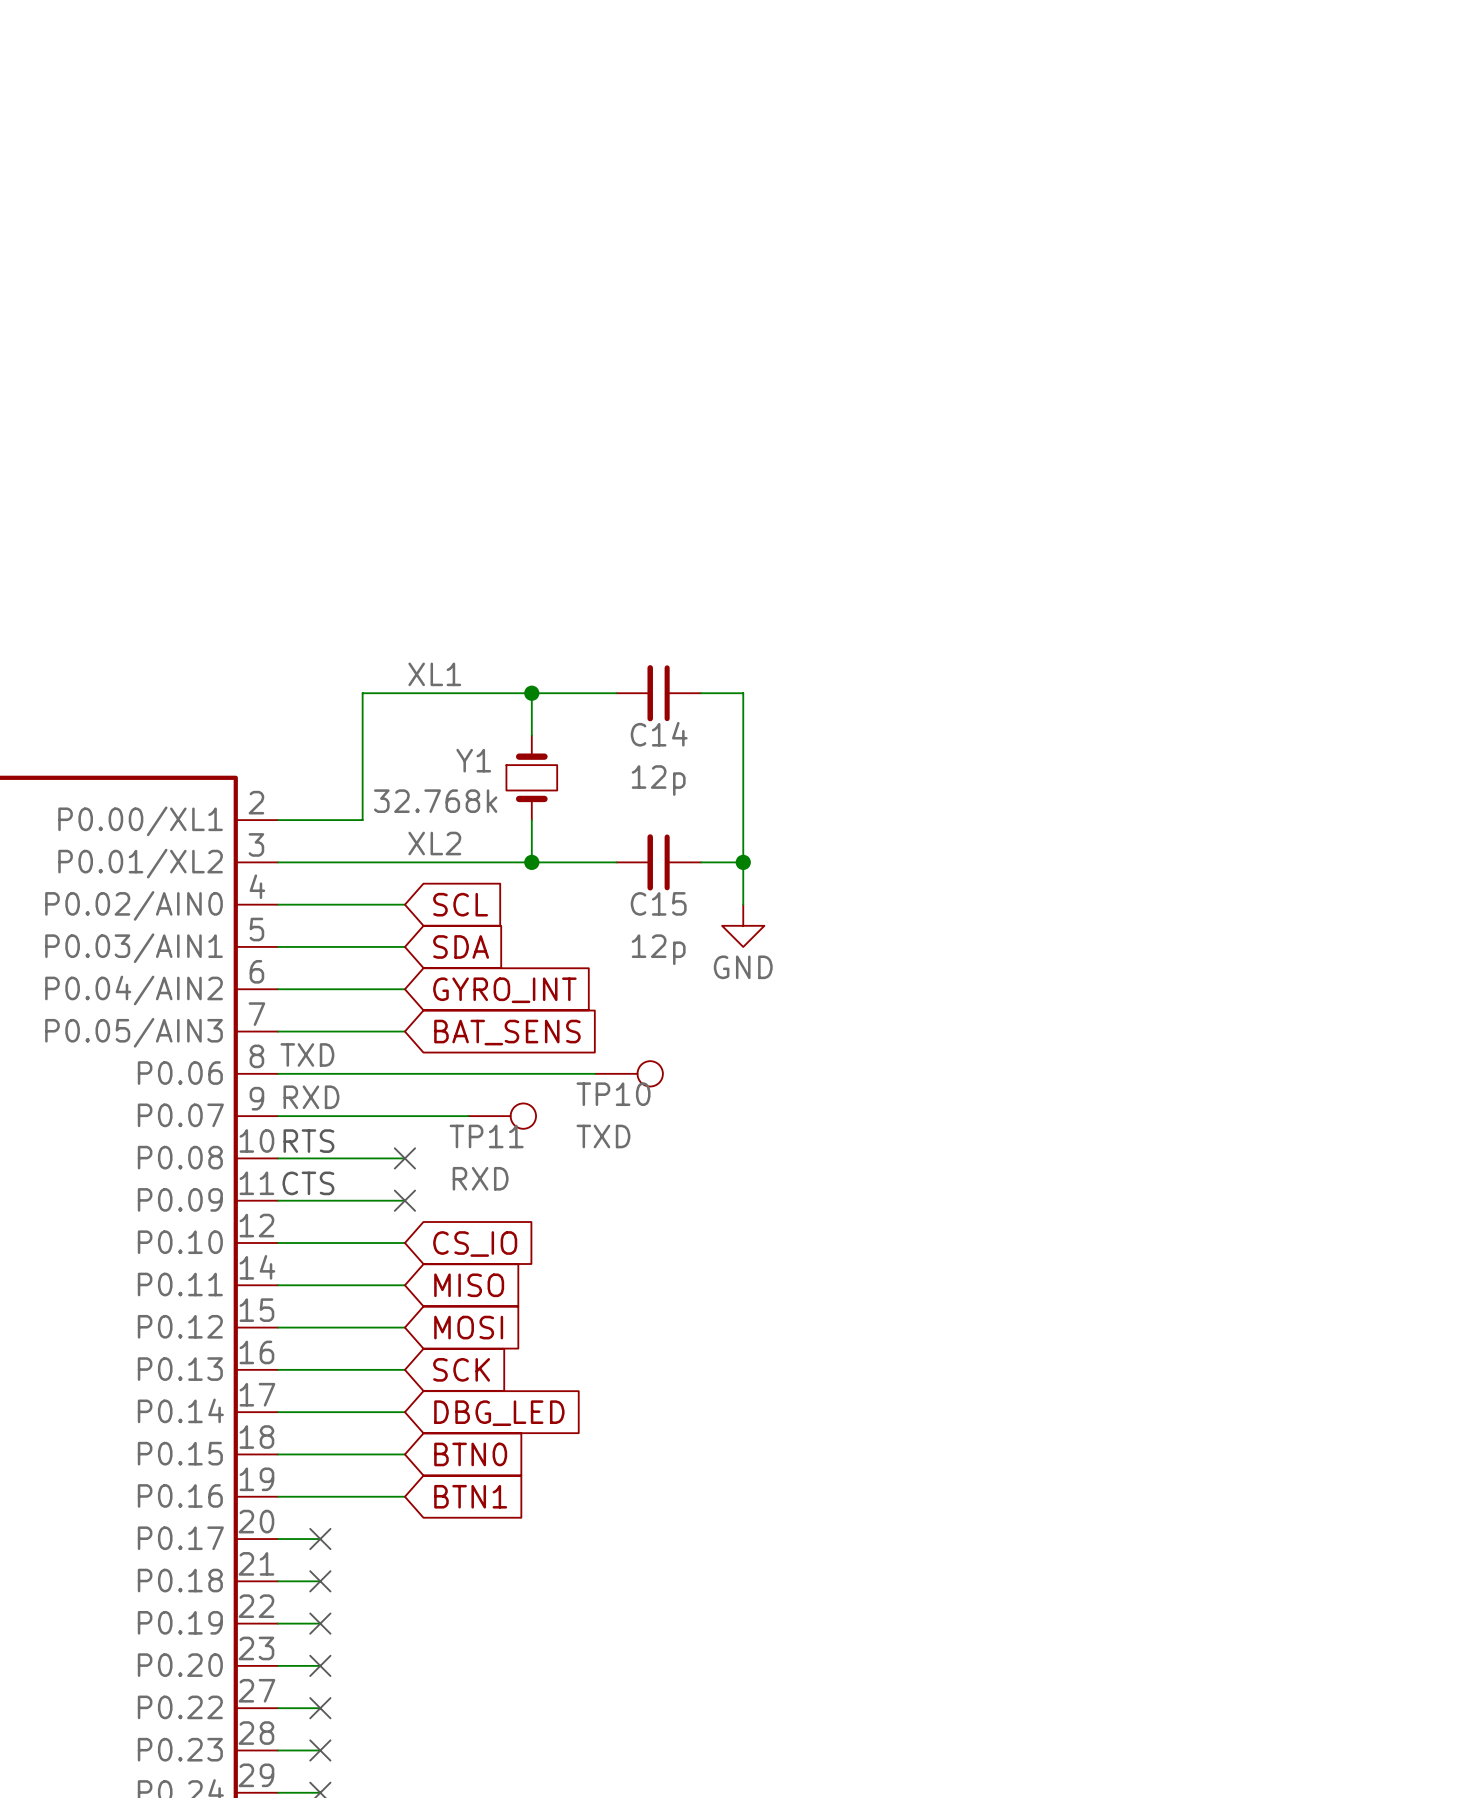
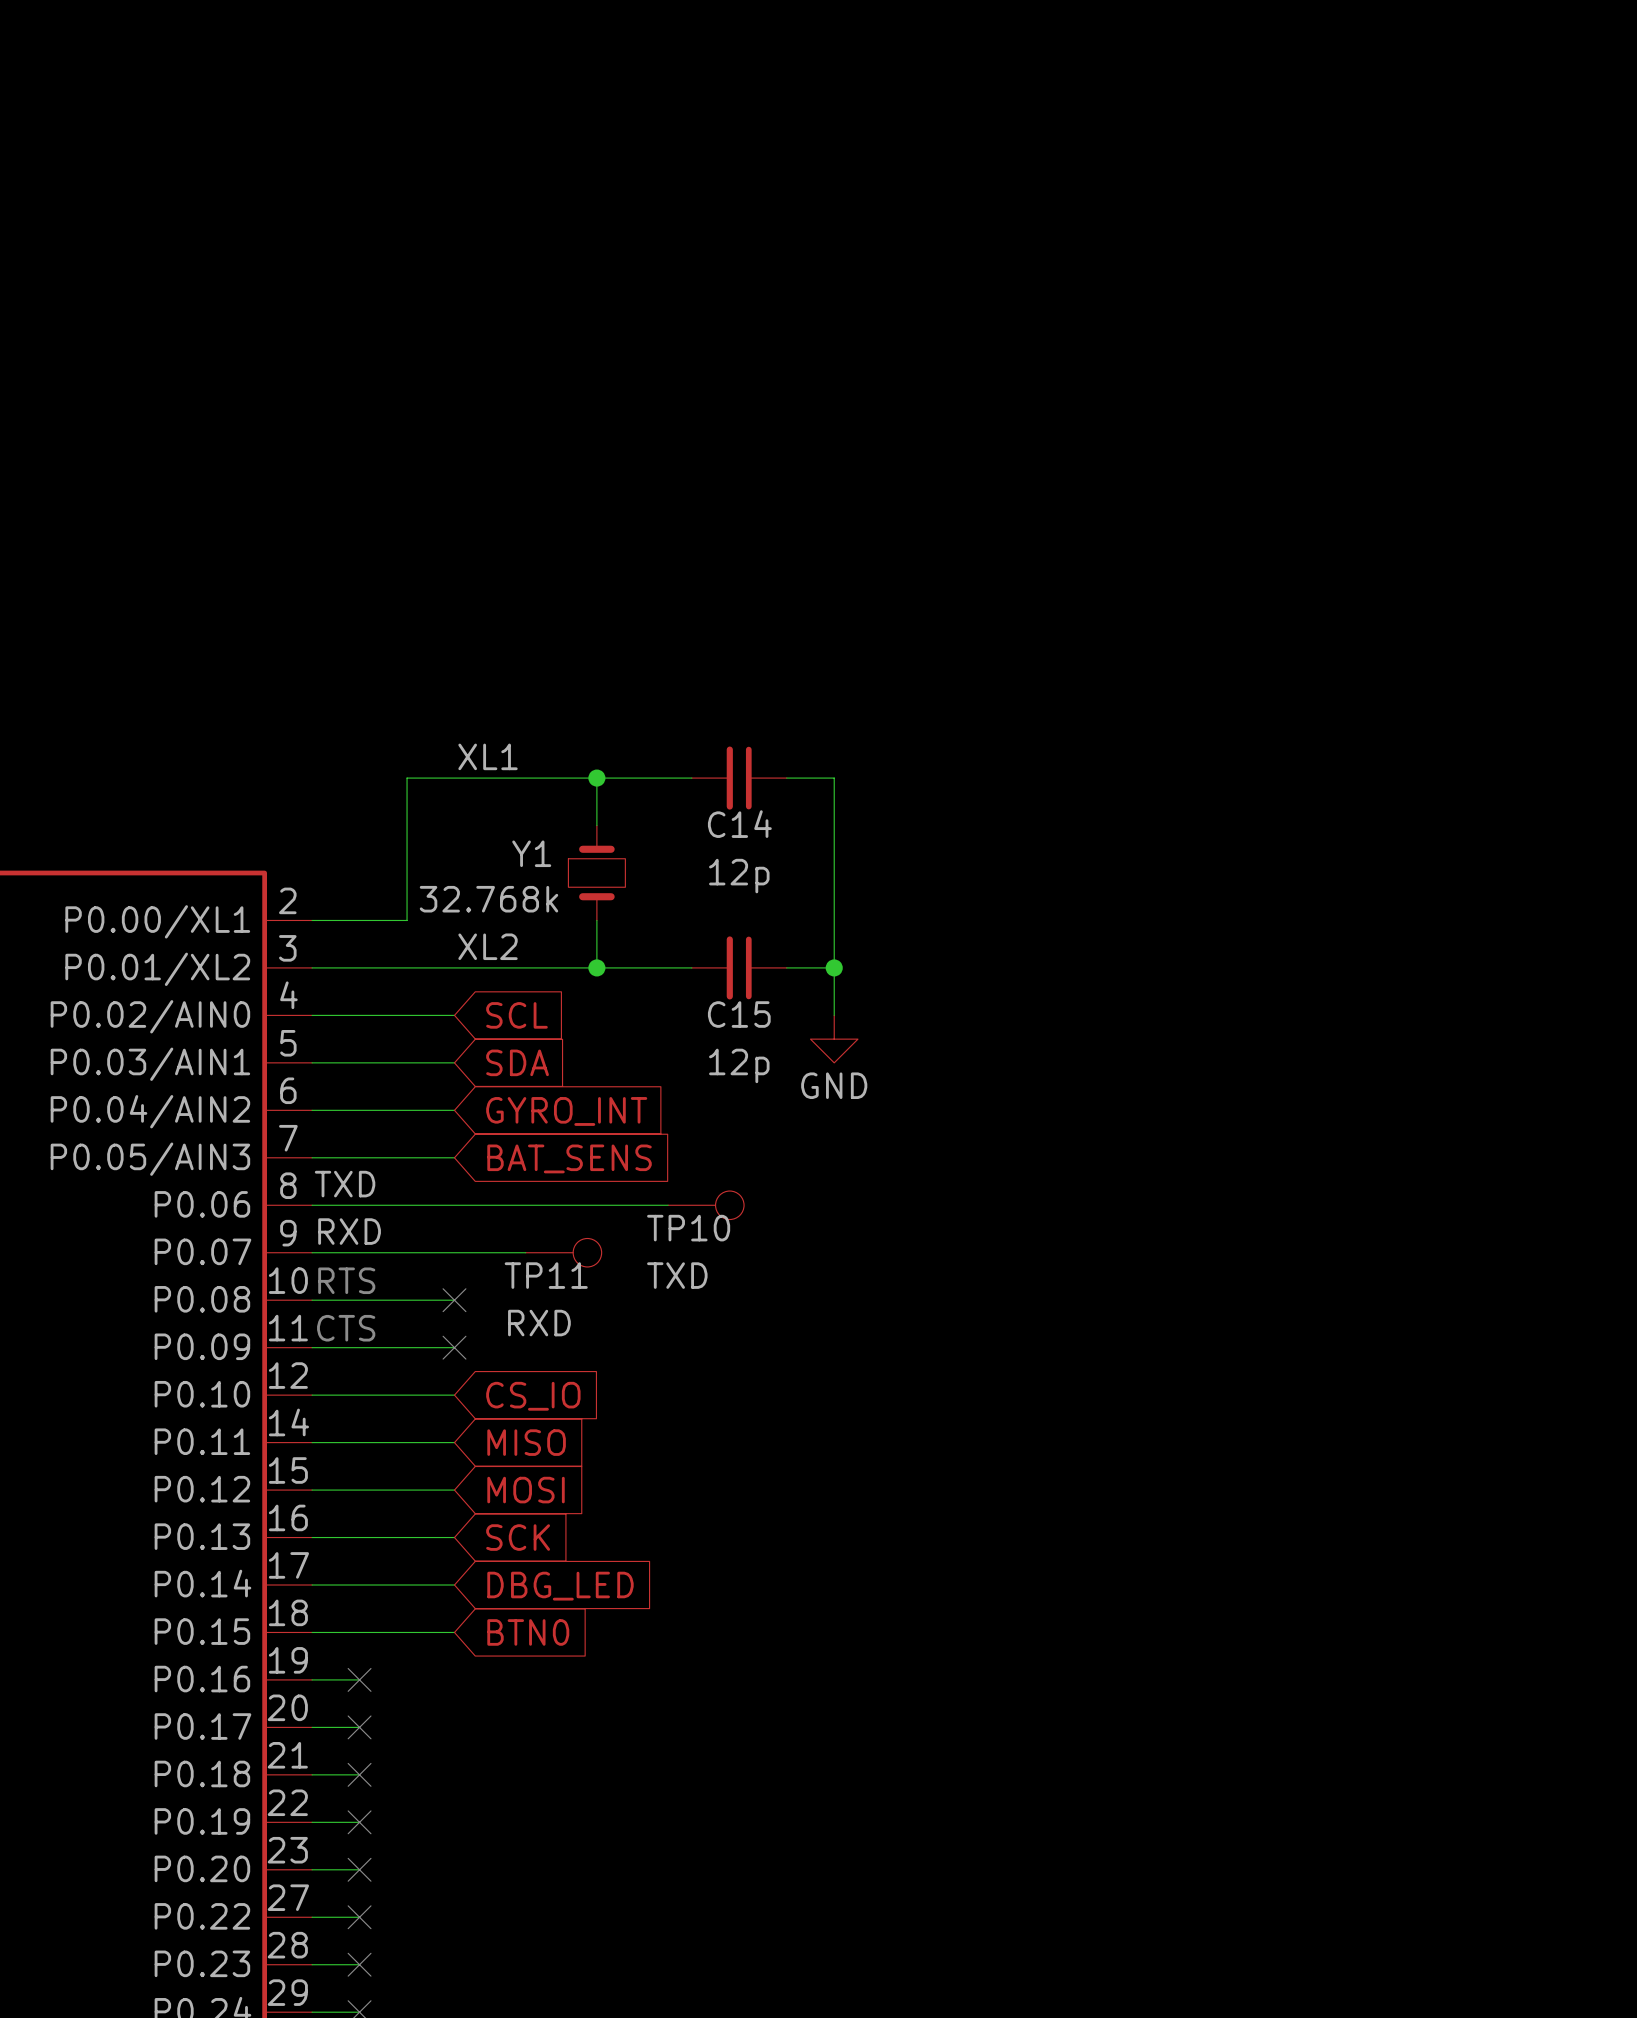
wire: (320, 1496) (404, 1496) -> none
no-connect mark: none -> (359, 1679)
global label: BTN1 (470, 1496) -> none

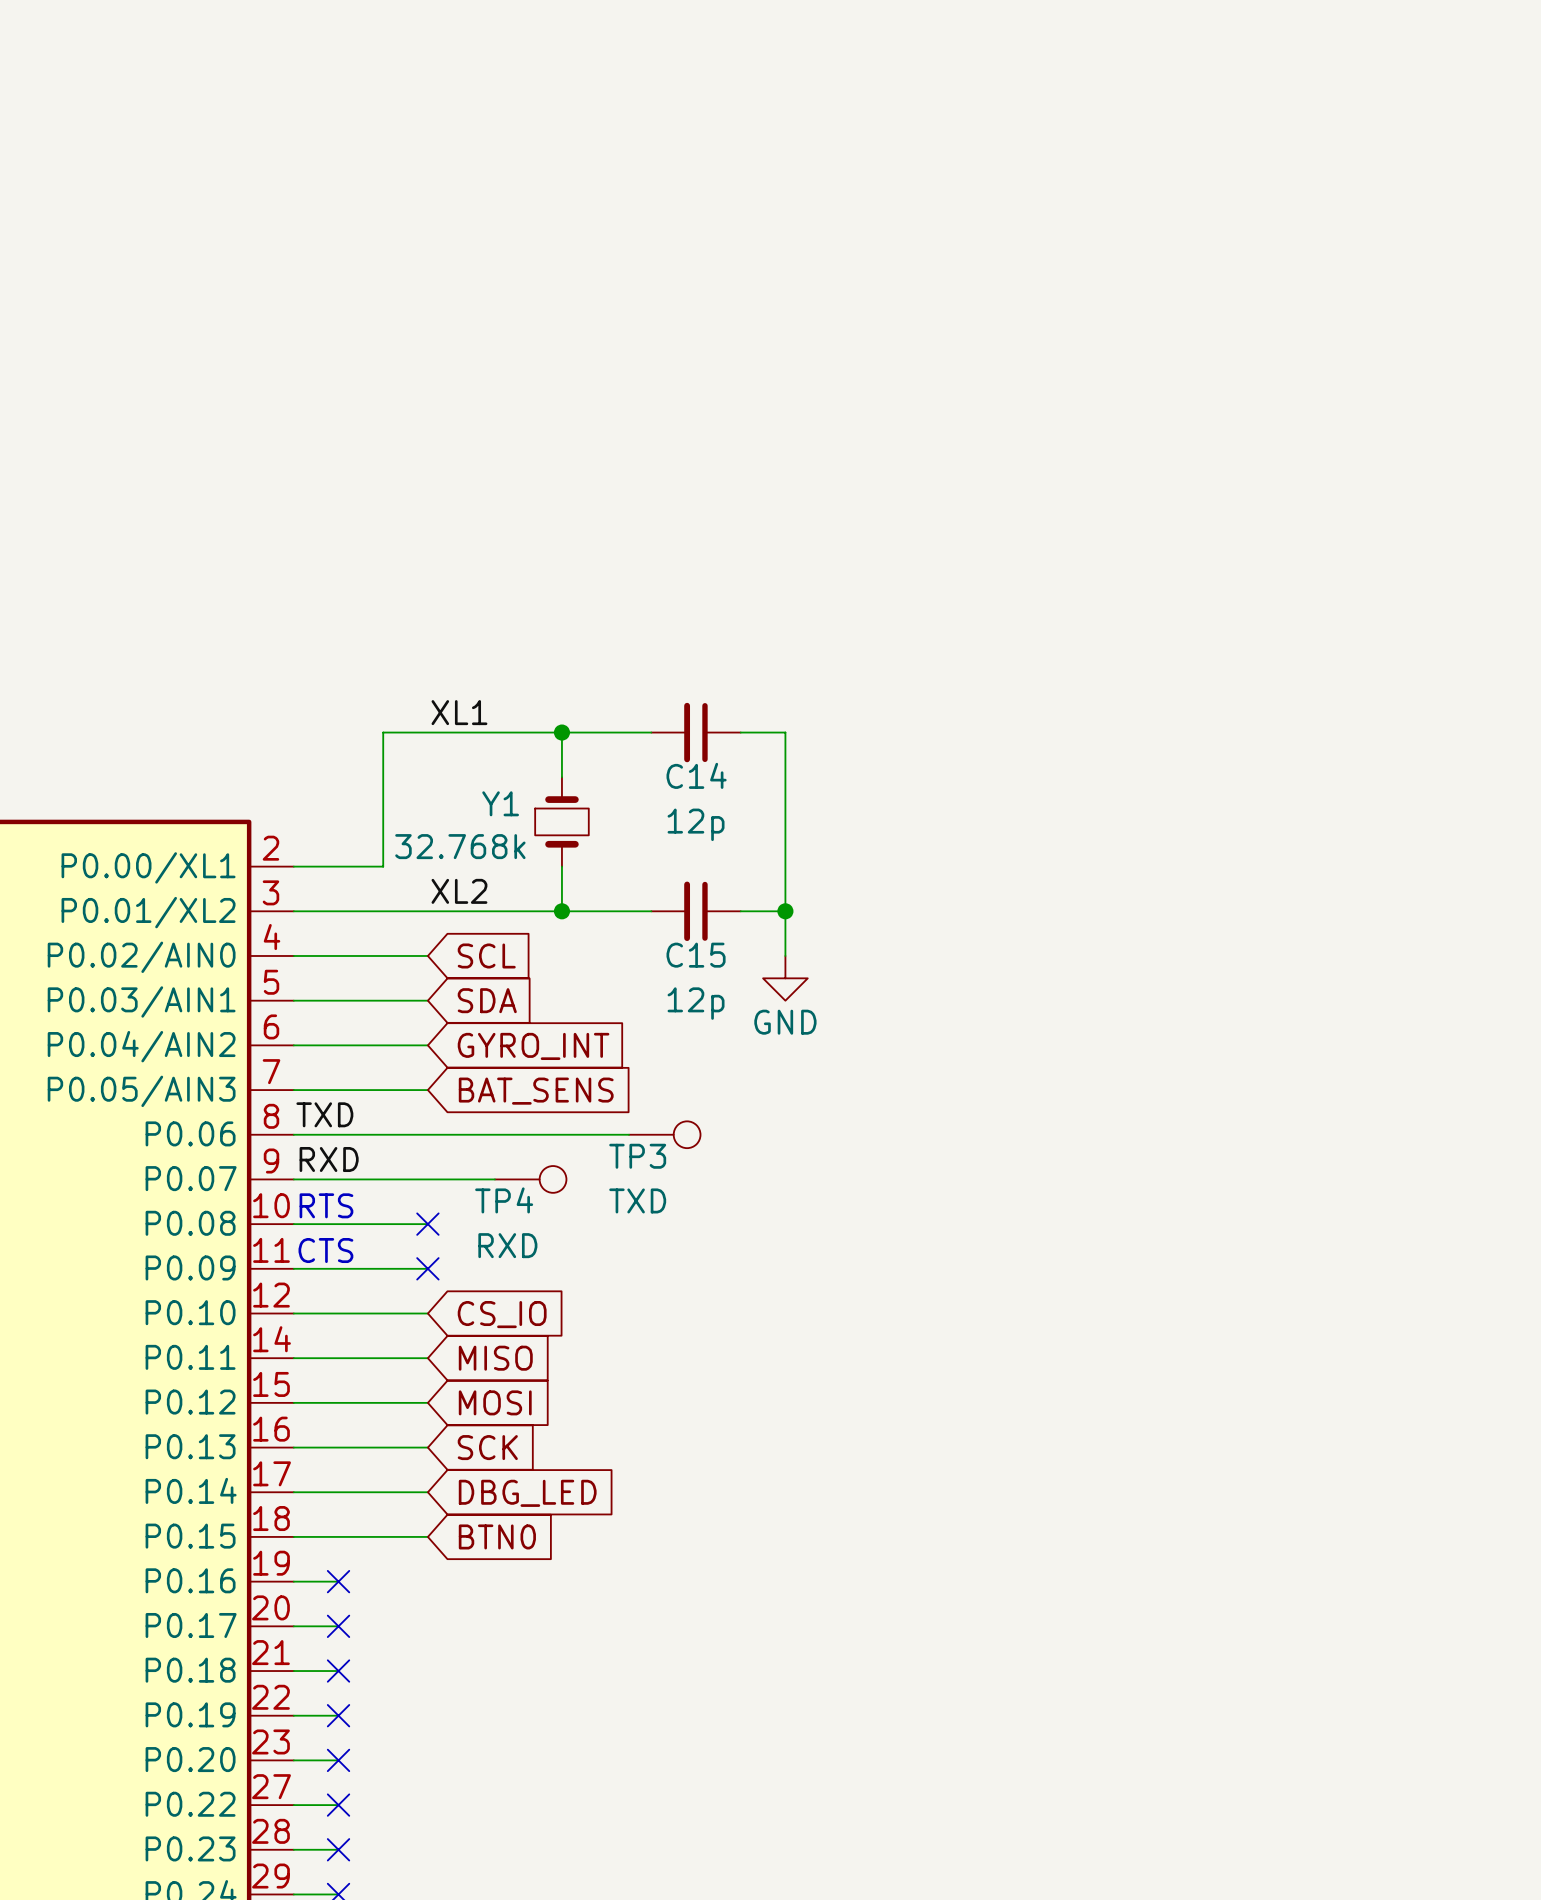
TP10 name: TP10 (688, 1228) -> TP3 (637, 1156)
TP11 name: TP11 (546, 1275) -> TP4 (504, 1200)

